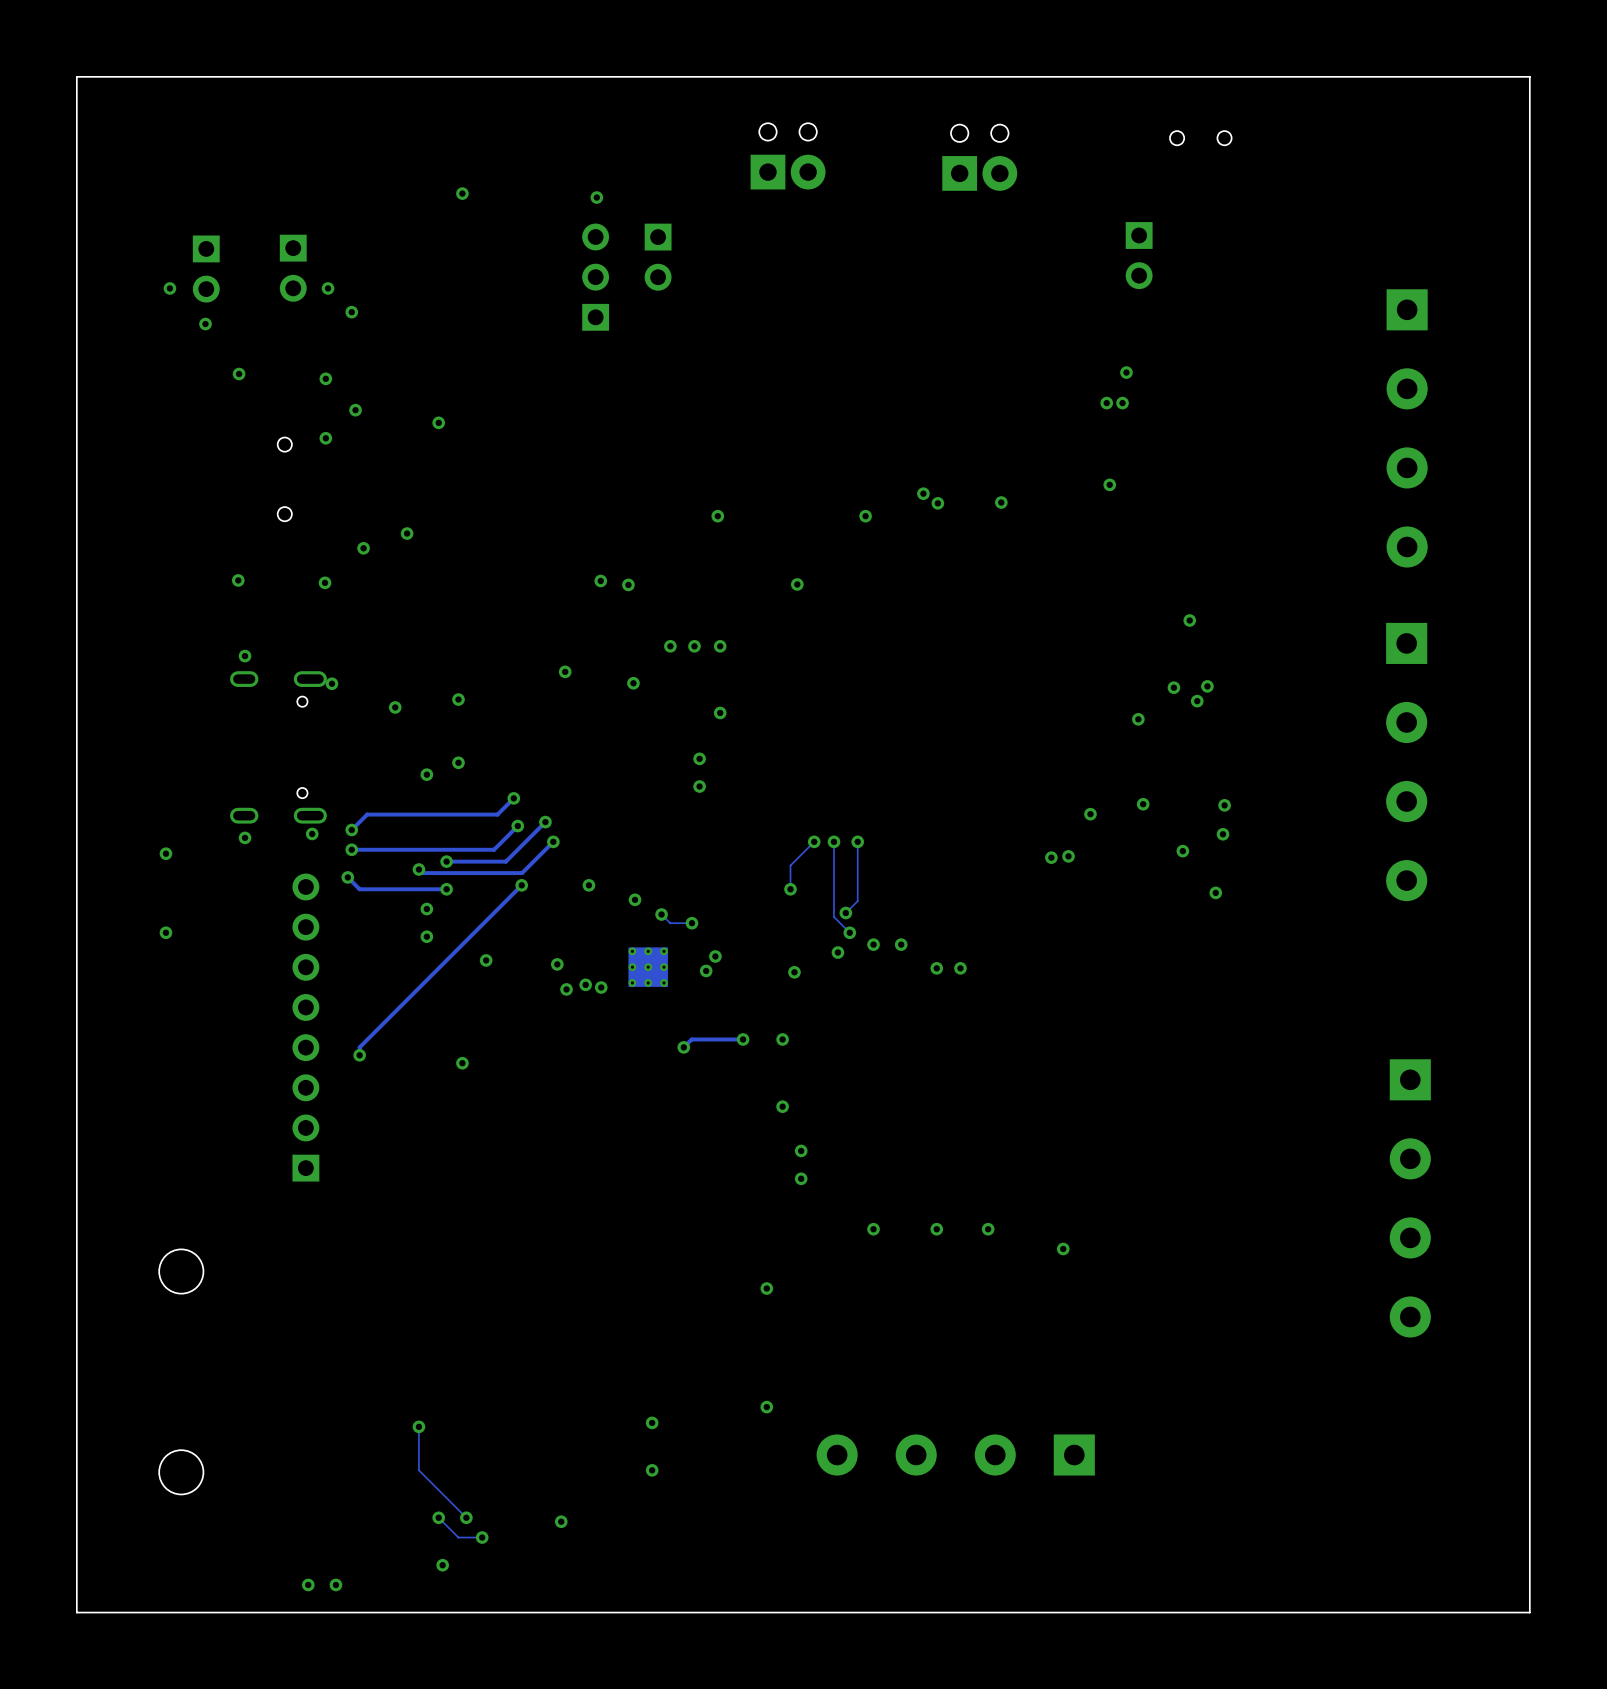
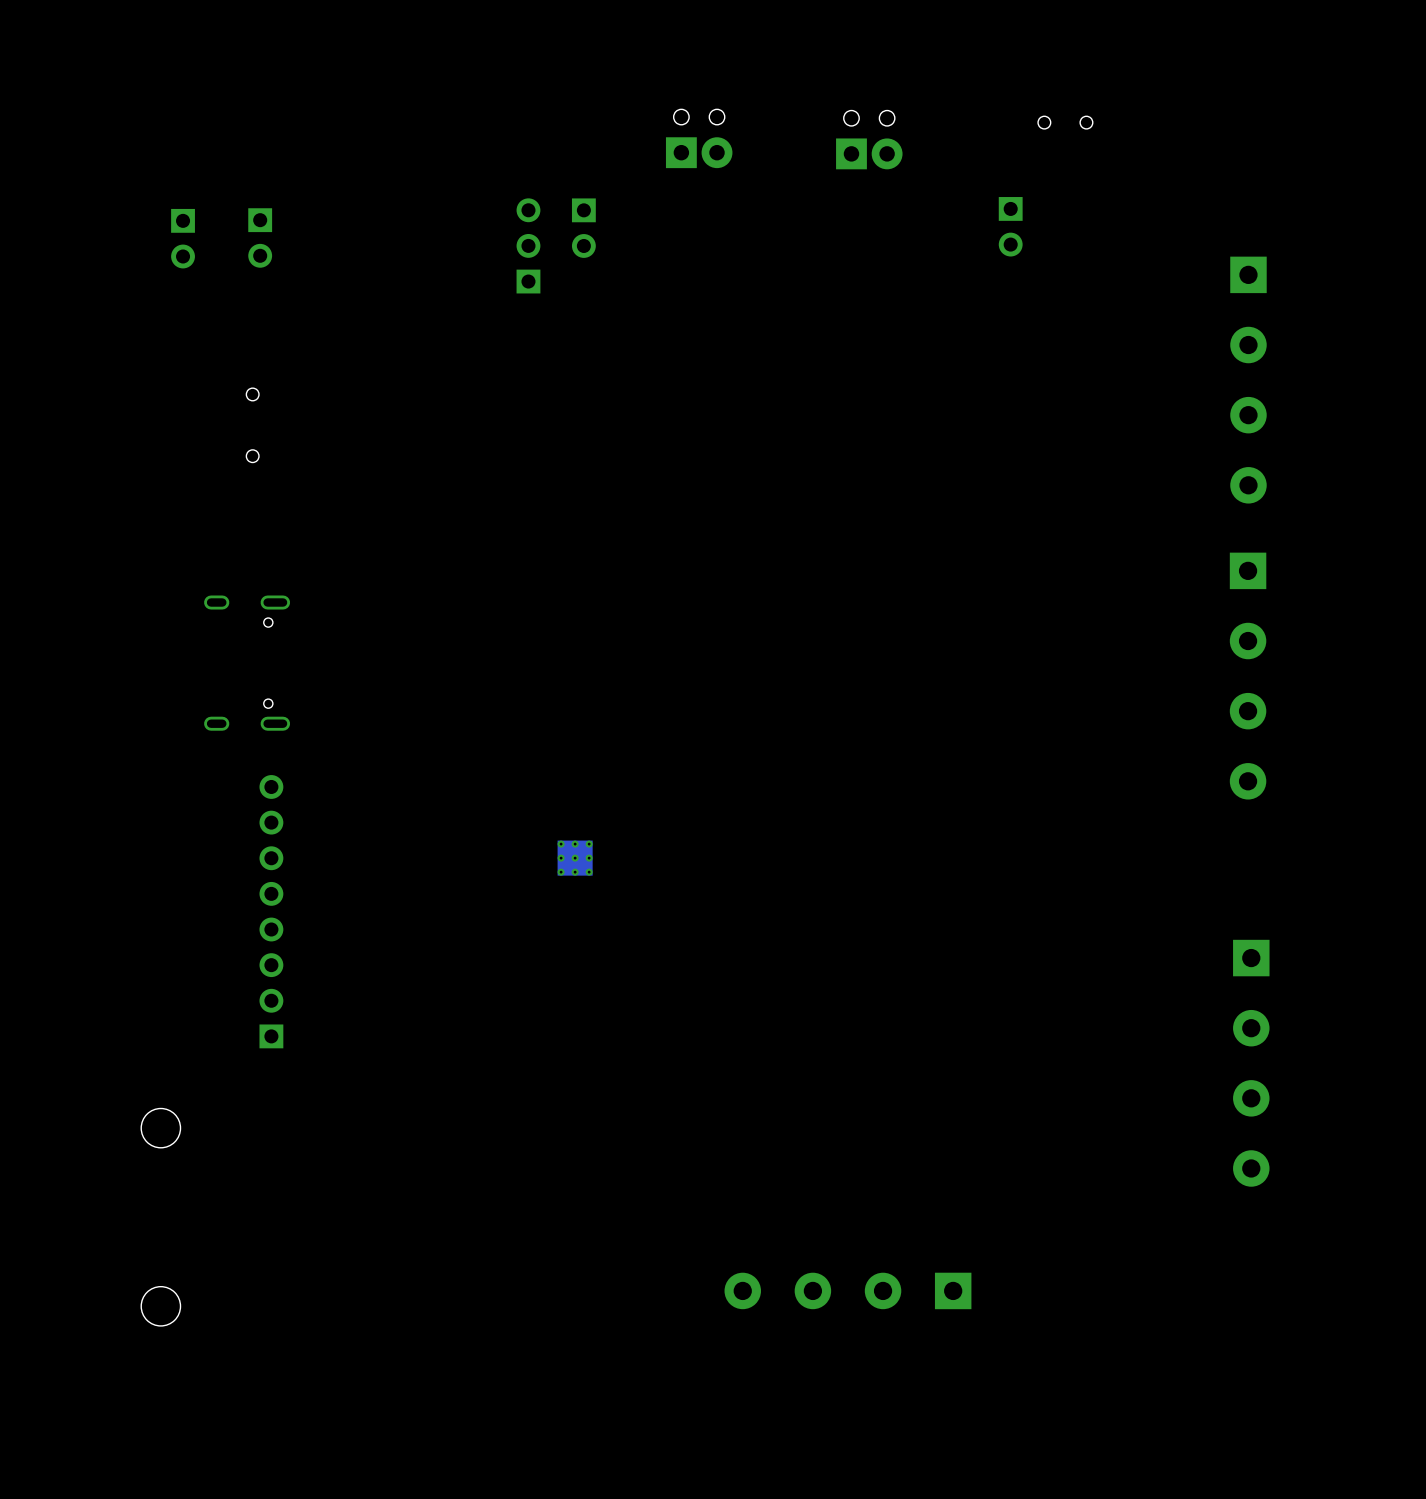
board edge: (1529, 76) (76, 76) (76, 1612) (1529, 1612) (1529, 76) -> none
via: (462, 193) -> none
via: (596, 197) -> none
via: (169, 288) -> none
via: (328, 288) -> none
via: (351, 312) -> none
via: (205, 324) -> none
via: (1126, 372) -> none
via: (239, 374) -> none
via: (325, 378) -> none
via: (1106, 403) -> none
via: (1122, 403) -> none
via: (355, 410) -> none
via: (438, 422) -> none
via: (325, 438) -> none
via: (1109, 484) -> none
via: (923, 493) -> none
via: (1001, 502) -> none
via: (937, 503) -> none
via: (717, 516) -> none
via: (865, 516) -> none
via: (407, 533) -> none
via: (363, 548) -> none
via: (238, 580) -> none
via: (600, 580) -> none
via: (325, 582) -> none
via: (628, 584) -> none
via: (797, 584) -> none
via: (1189, 620) -> none
via: (670, 646) -> none
via: (694, 646) -> none
via: (720, 646) -> none
via: (245, 656) -> none
via: (565, 671) -> none
via: (331, 683) -> none
via: (633, 683) -> none
via: (1207, 686) -> none
via: (1173, 687) -> none
via: (458, 699) -> none
via: (1197, 701) -> none
via: (395, 707) -> none
via: (720, 712) -> none
via: (1138, 719) -> none
via: (699, 758) -> none
via: (458, 762) -> none
via: (426, 774) -> none
via: (699, 786) -> none
track: (513, 798) (497, 814) (367, 814) (351, 829) -> none
via: (513, 798) -> none
via: (1143, 804) -> none
via: (1224, 805) -> none
via: (1090, 814) -> none
track: (545, 822) (505, 861) (446, 861) -> none
via: (545, 822) -> none
track: (517, 826) (494, 849) (351, 849) -> none
via: (517, 826) -> none
via: (351, 829) -> none
via: (312, 833) -> none
via: (1223, 834) -> none
via: (245, 837) -> none
track: (553, 841) (522, 873) (422, 873) (418, 869) -> none
via: (553, 841) -> none
track: (814, 841) (790, 865) (790, 889) -> none
via: (814, 841) -> none
track: (833, 841) (833, 916) (849, 932) -> none
via: (833, 841) -> none
track: (857, 841) (857, 901) (845, 913) -> none
via: (857, 841) -> none
via: (351, 849) -> none
via: (1182, 851) -> none
via: (165, 853) -> none
via: (1068, 856) -> none
via: (1051, 857) -> none
via: (446, 861) -> none
via: (418, 869) -> none
track: (347, 877) (359, 889) (446, 889) -> none
via: (347, 877) -> none
track: (521, 885) (359, 1047) (359, 1055) -> none
via: (521, 885) -> none
via: (588, 885) -> none
via: (446, 889) -> none
via: (790, 889) -> none
via: (1215, 892) -> none
via: (635, 899) -> none
via: (426, 909) -> none
via: (845, 913) -> none
track: (661, 914) (670, 923) (691, 923) -> none
via: (661, 914) -> none
via: (691, 923) -> none
via: (165, 932) -> none
via: (849, 932) -> none
via: (426, 936) -> none
via: (873, 944) -> none
via: (901, 944) -> none
via: (837, 952) -> none
via: (715, 956) -> none
via: (486, 960) -> none
via: (557, 964) -> none
via: (936, 968) -> none
via: (960, 968) -> none
via: (706, 970) -> none
via: (794, 972) -> none
via: (585, 984) -> none
via: (601, 987) -> none
via: (566, 989) -> none
track: (743, 1039) (691, 1039) (683, 1047) -> none
via: (743, 1039) -> none
via: (782, 1039) -> none
via: (683, 1047) -> none
via: (359, 1055) -> none
via: (462, 1063) -> none
via: (782, 1106) -> none
via: (801, 1150) -> none
via: (801, 1178) -> none
via: (873, 1229) -> none
via: (936, 1229) -> none
via: (988, 1229) -> none
via: (1063, 1248) -> none
via: (766, 1288) -> none
via: (766, 1407) -> none
via: (652, 1422) -> none
track: (418, 1426) (418, 1470) (466, 1517) -> none
via: (418, 1426) -> none
via: (652, 1470) -> none
track: (438, 1517) (458, 1537) (482, 1537) -> none
via: (438, 1517) -> none
via: (466, 1517) -> none
via: (561, 1521) -> none
via: (482, 1537) -> none
via: (442, 1565) -> none
via: (308, 1584) -> none
via: (335, 1584) -> none

